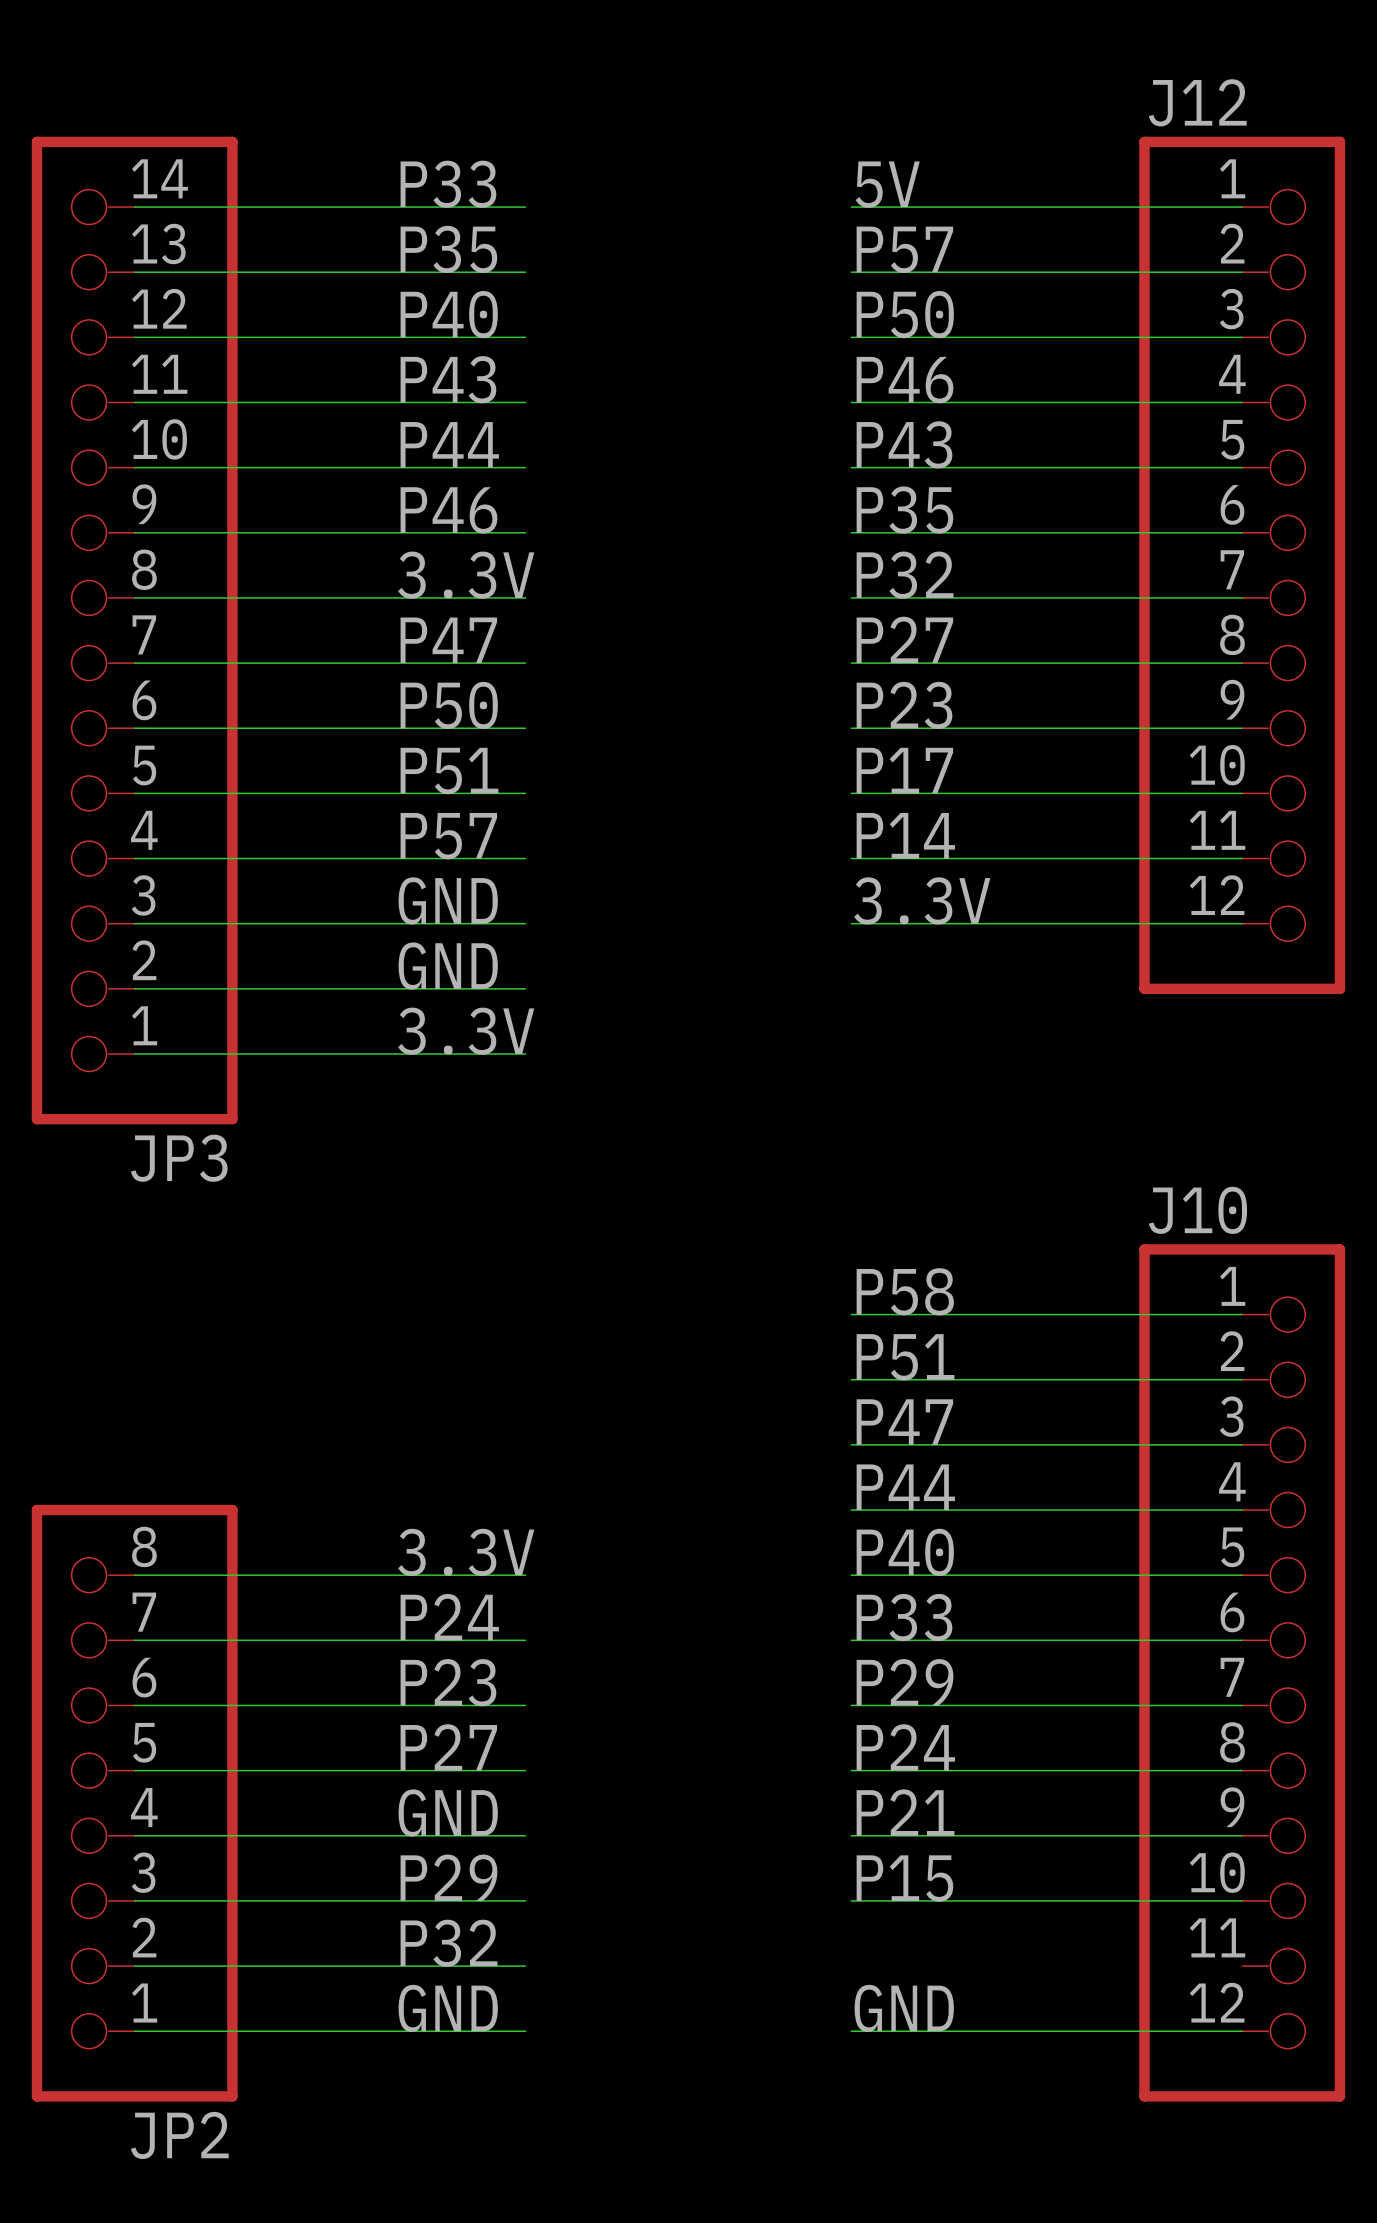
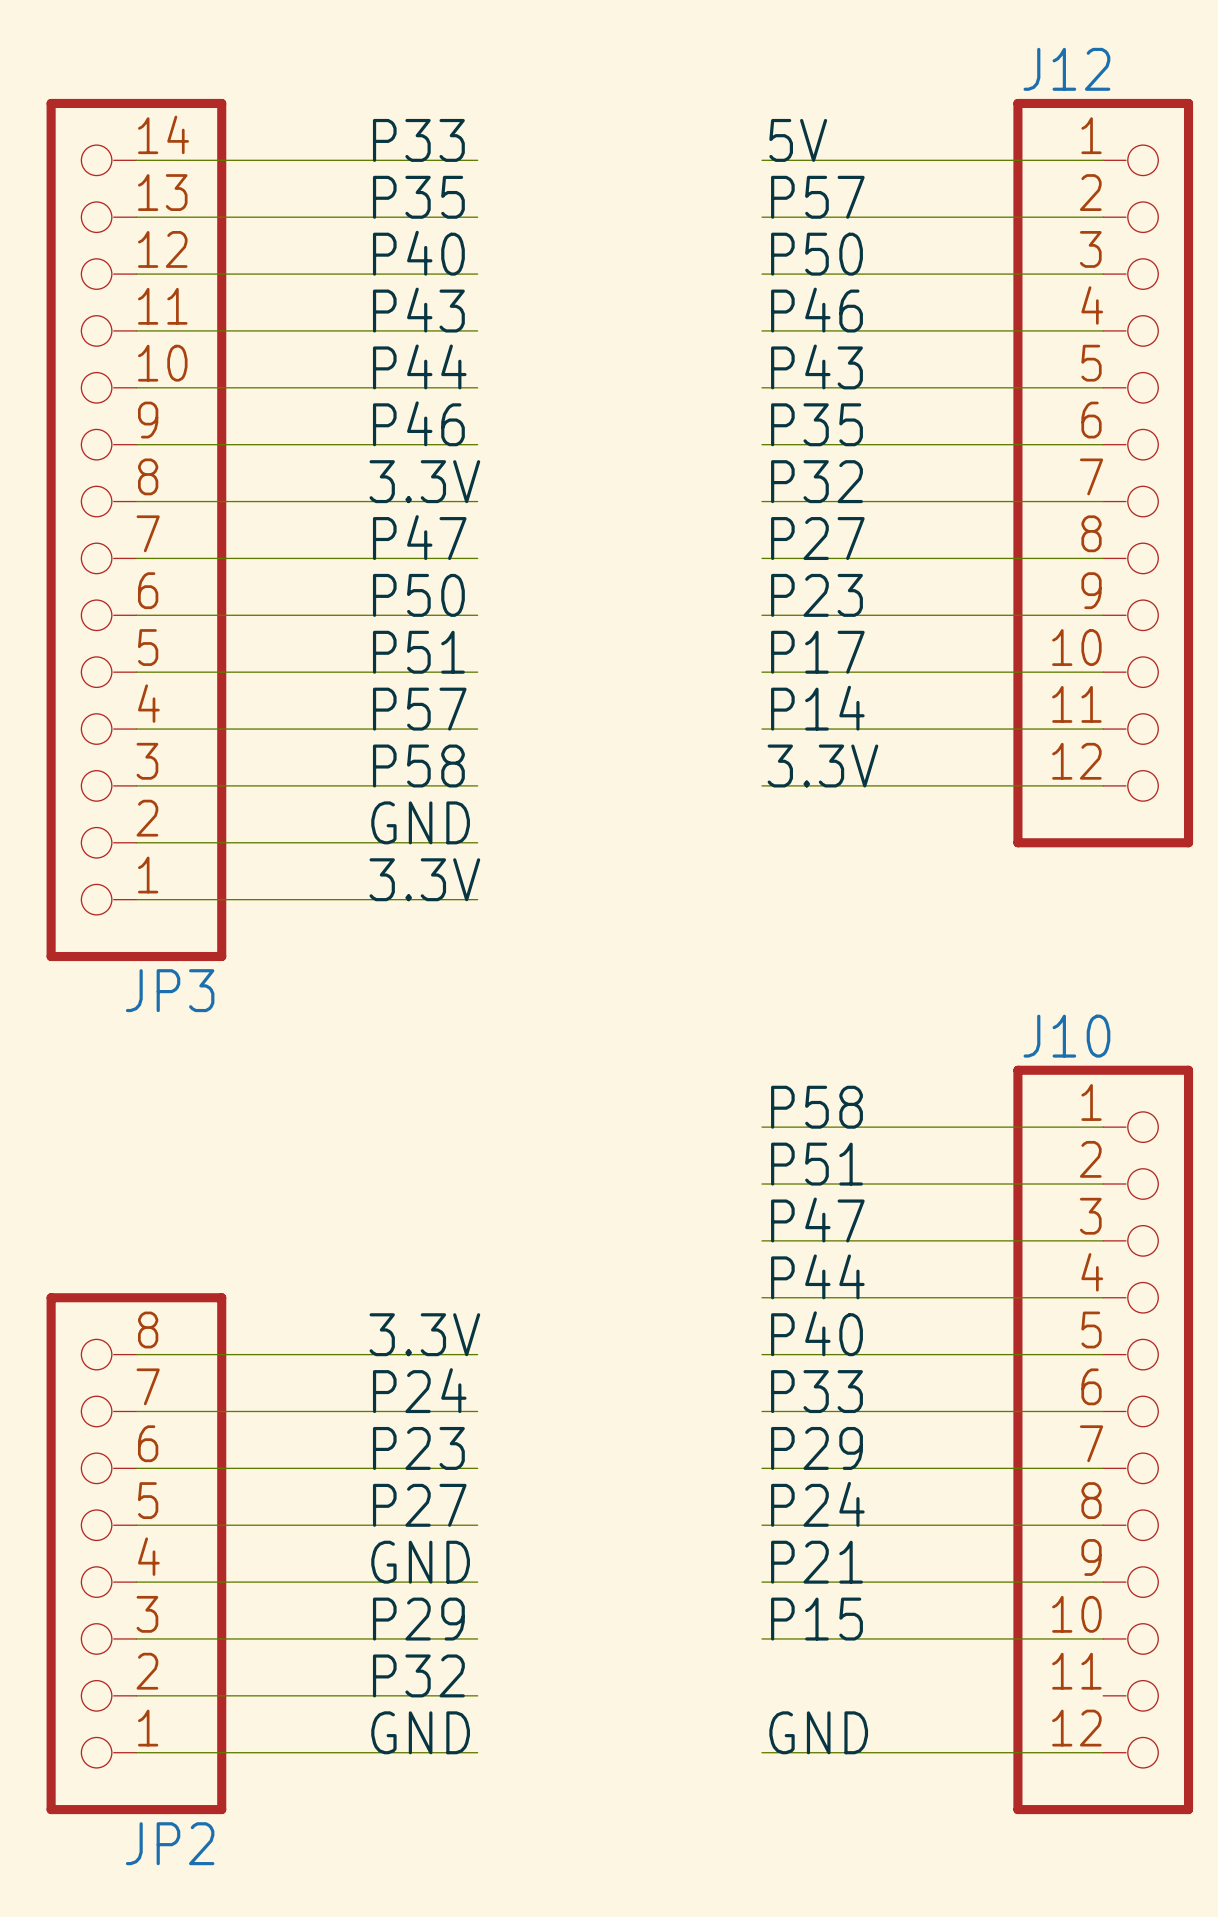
label: GND (448, 900) -> P58 (418, 766)

